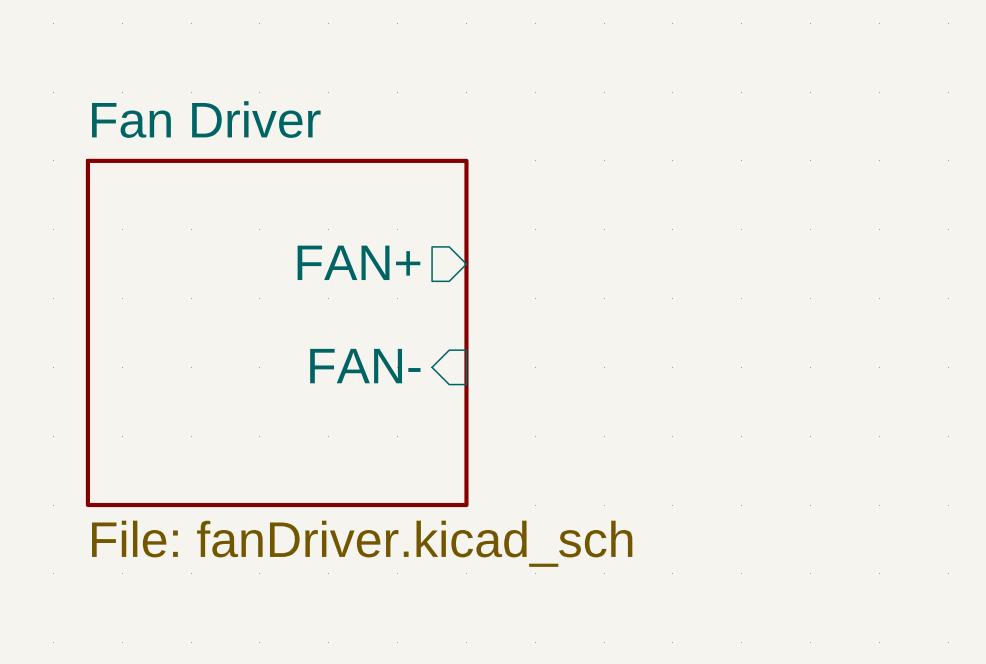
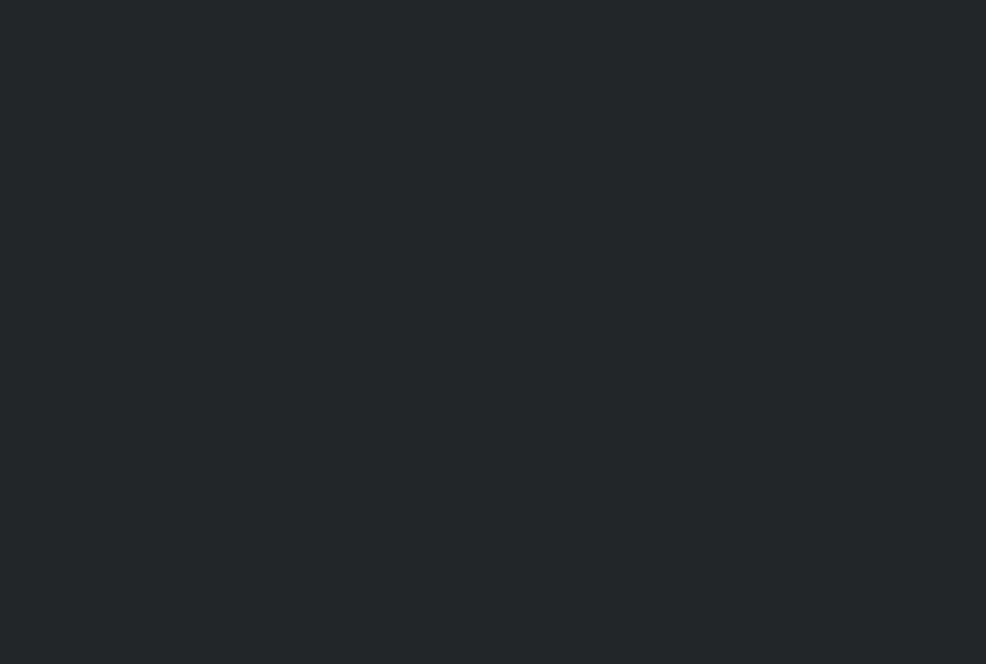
sheet pin: FAN+ (358, 262) -> none
sheet Fan Driver: File: fanDriver.kicad_sch (277, 332) -> none
sheet pin: FAN- (365, 366) -> none

